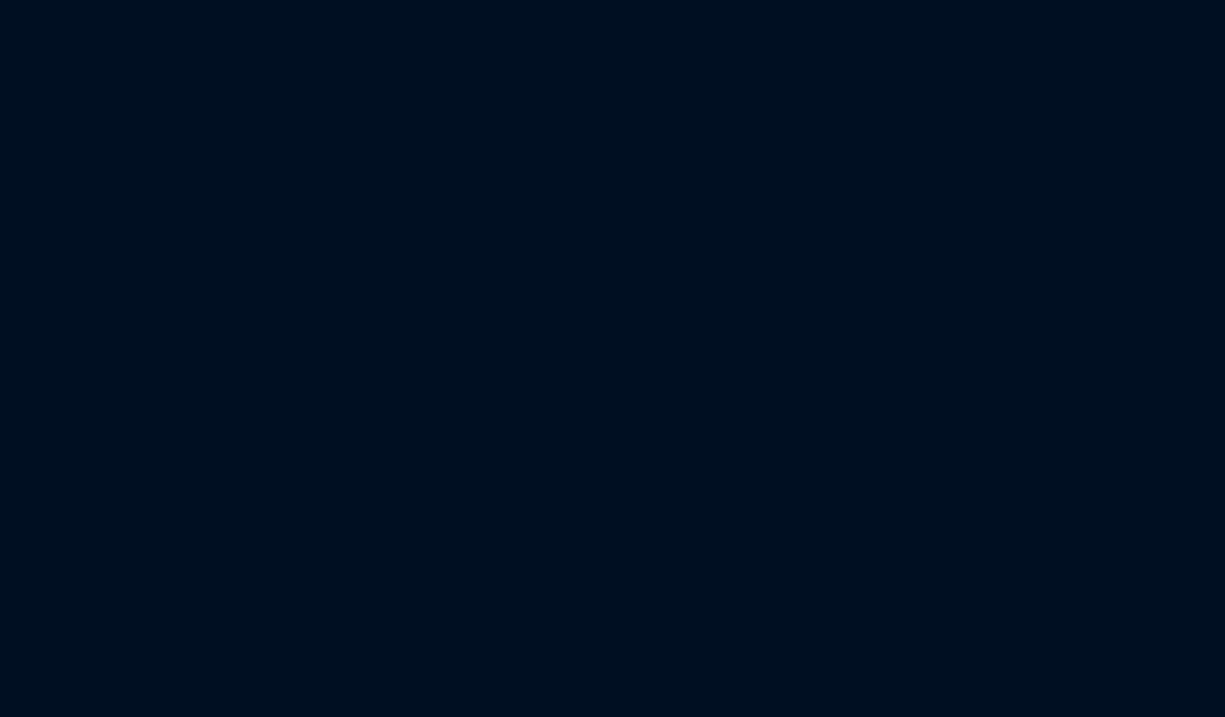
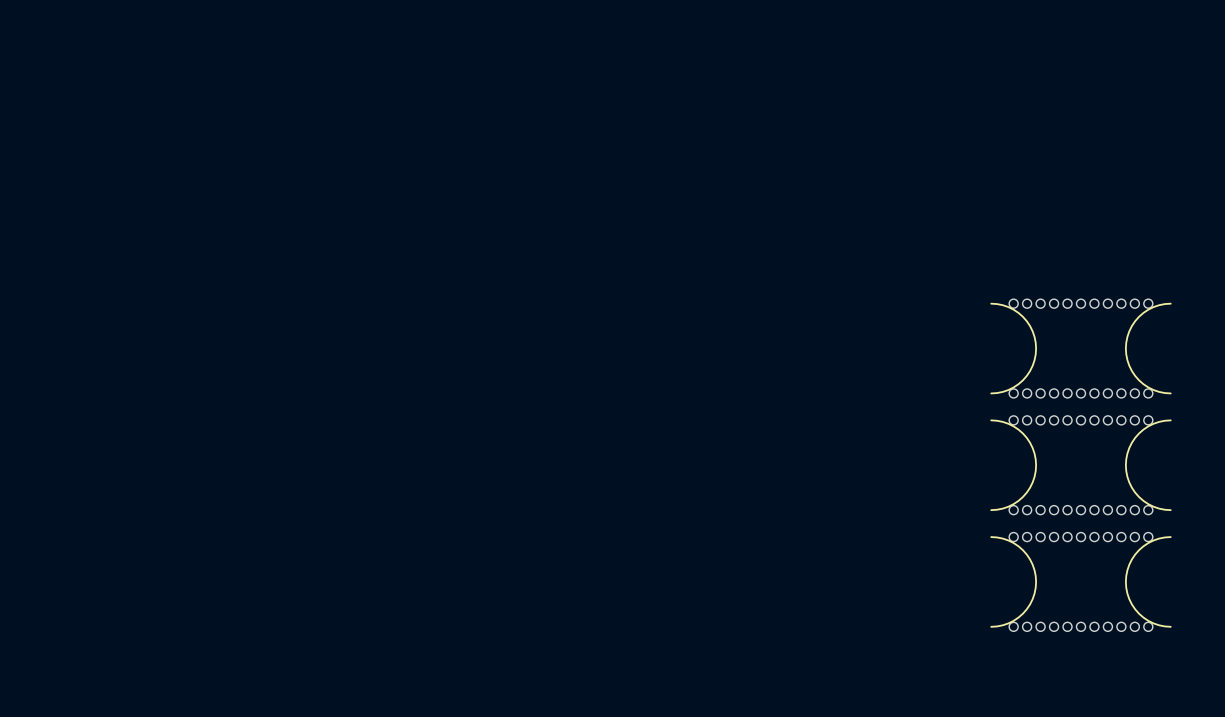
part: none -> (1080, 348)
part: none -> (1080, 465)
part: none -> (1080, 581)

